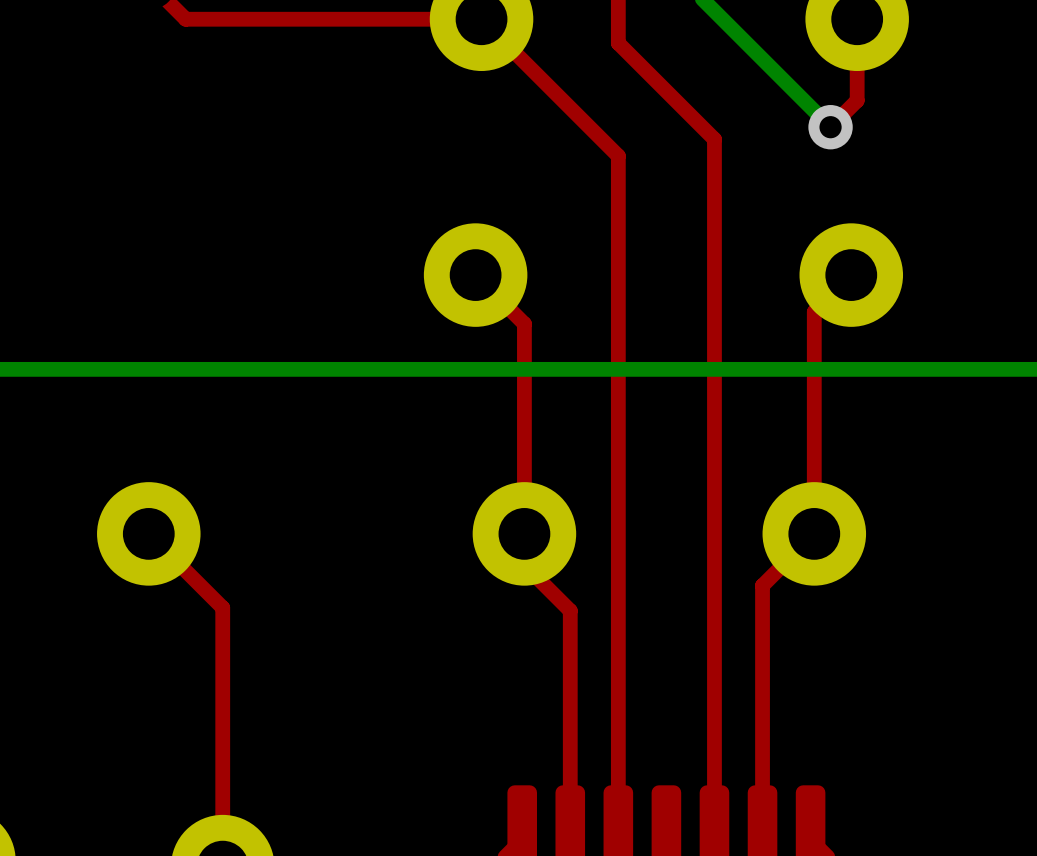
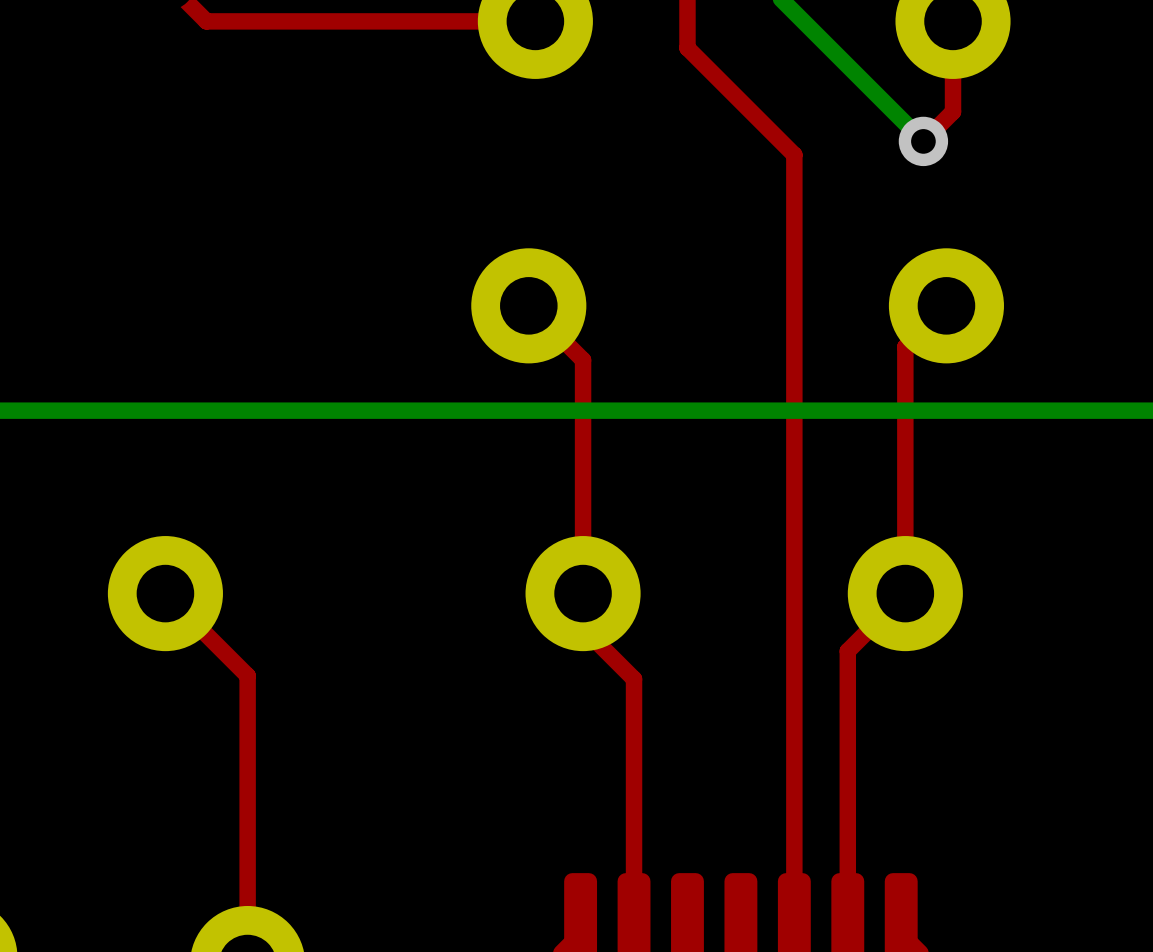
top track: (481, 19) (618, 156) (618, 839) -> none

